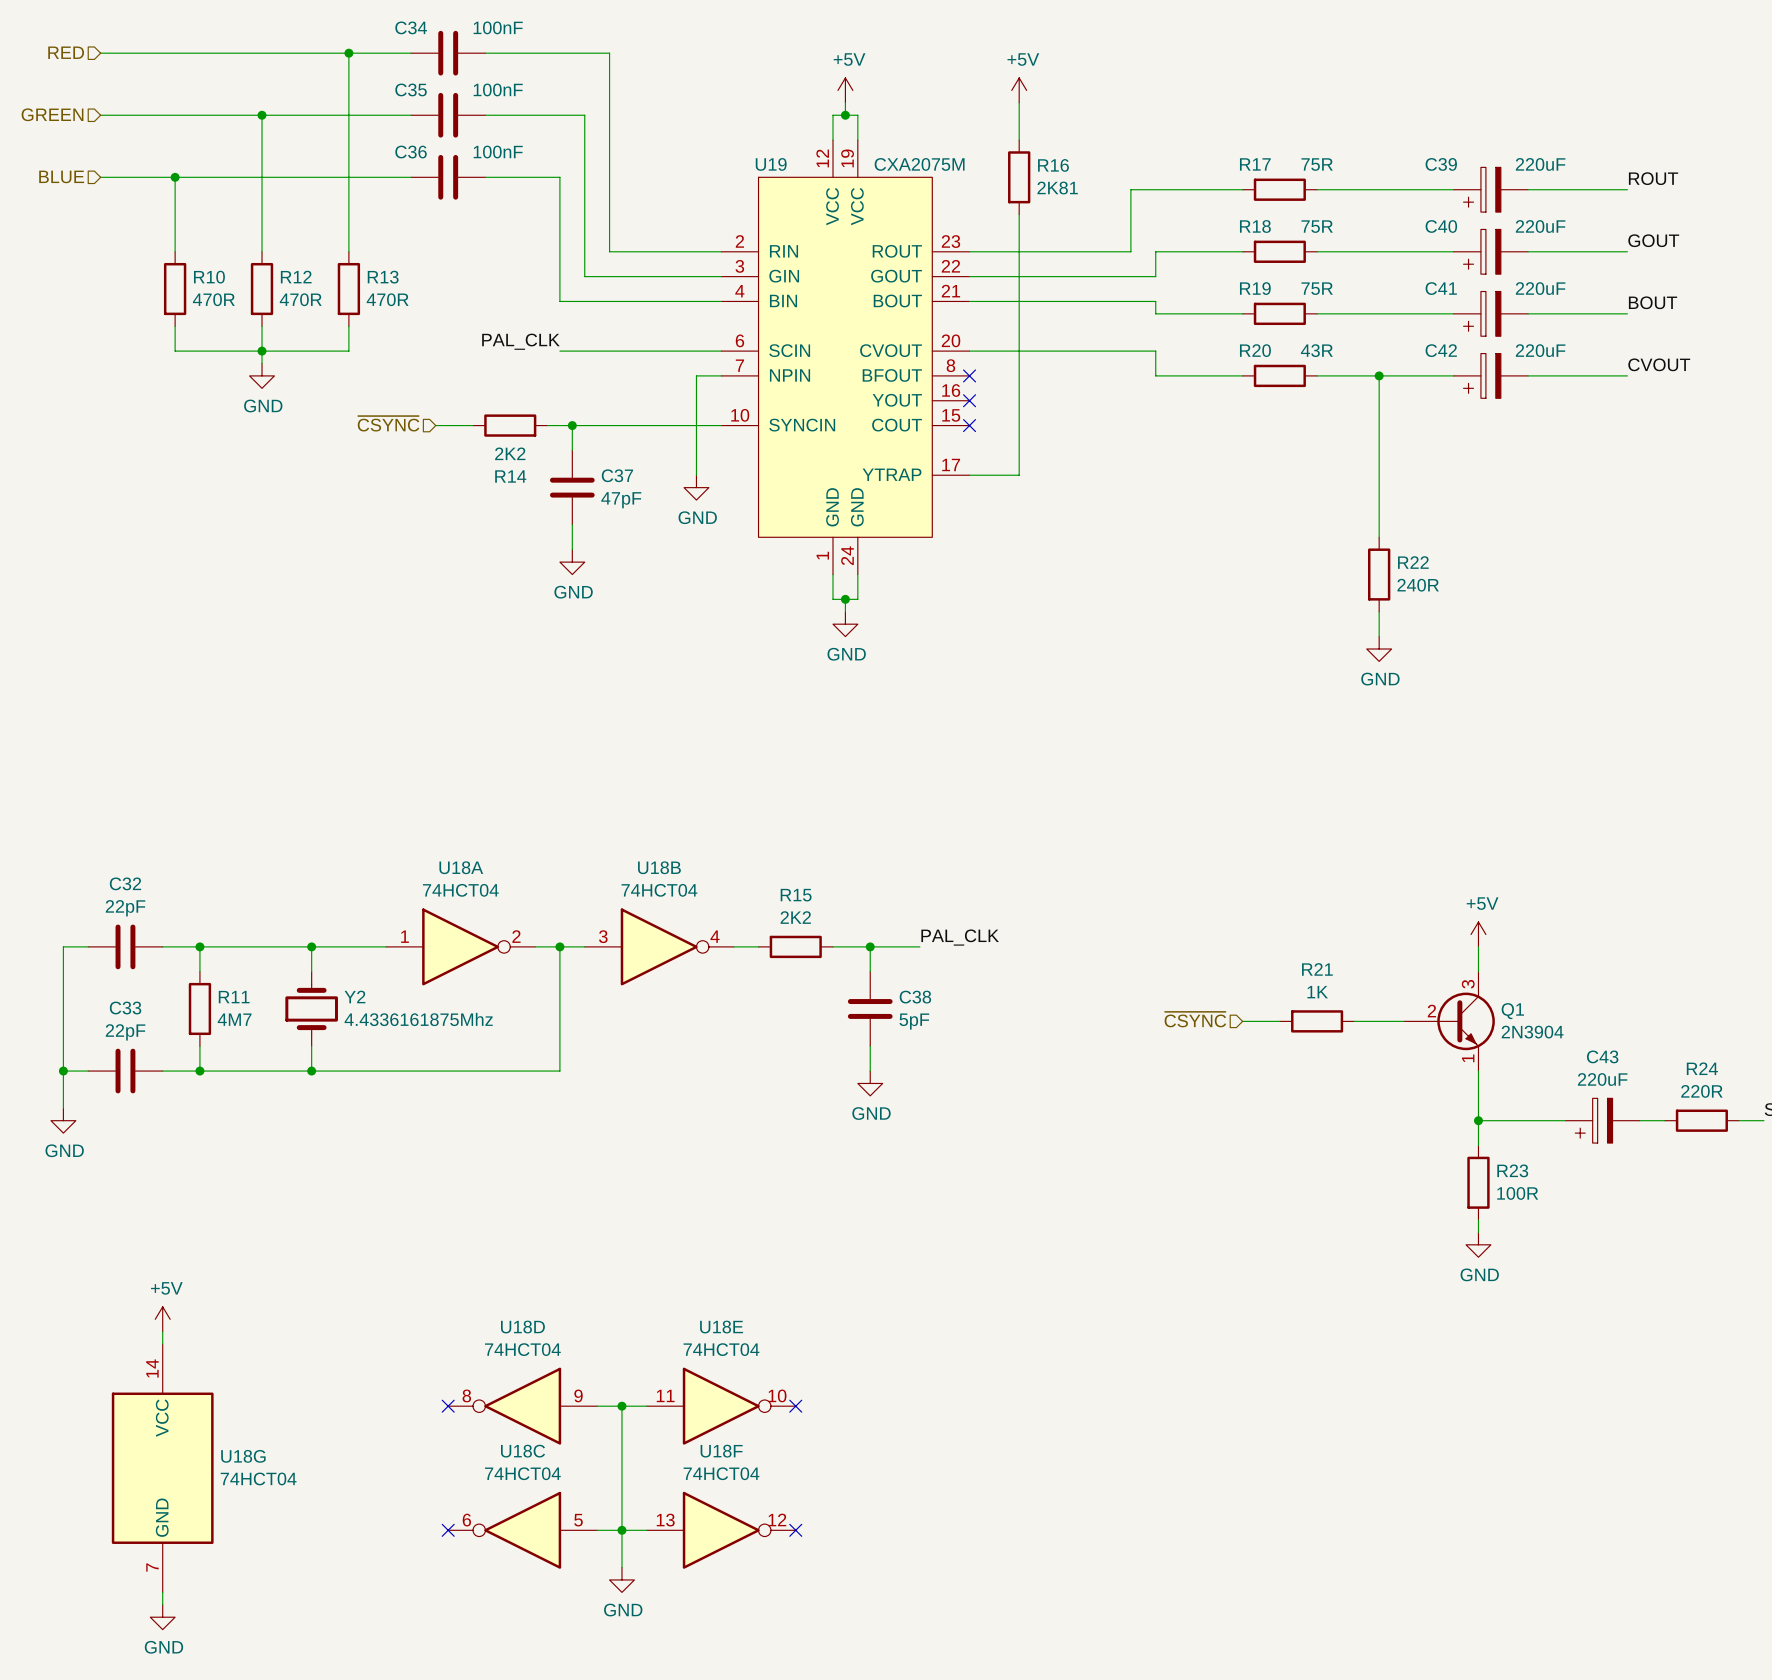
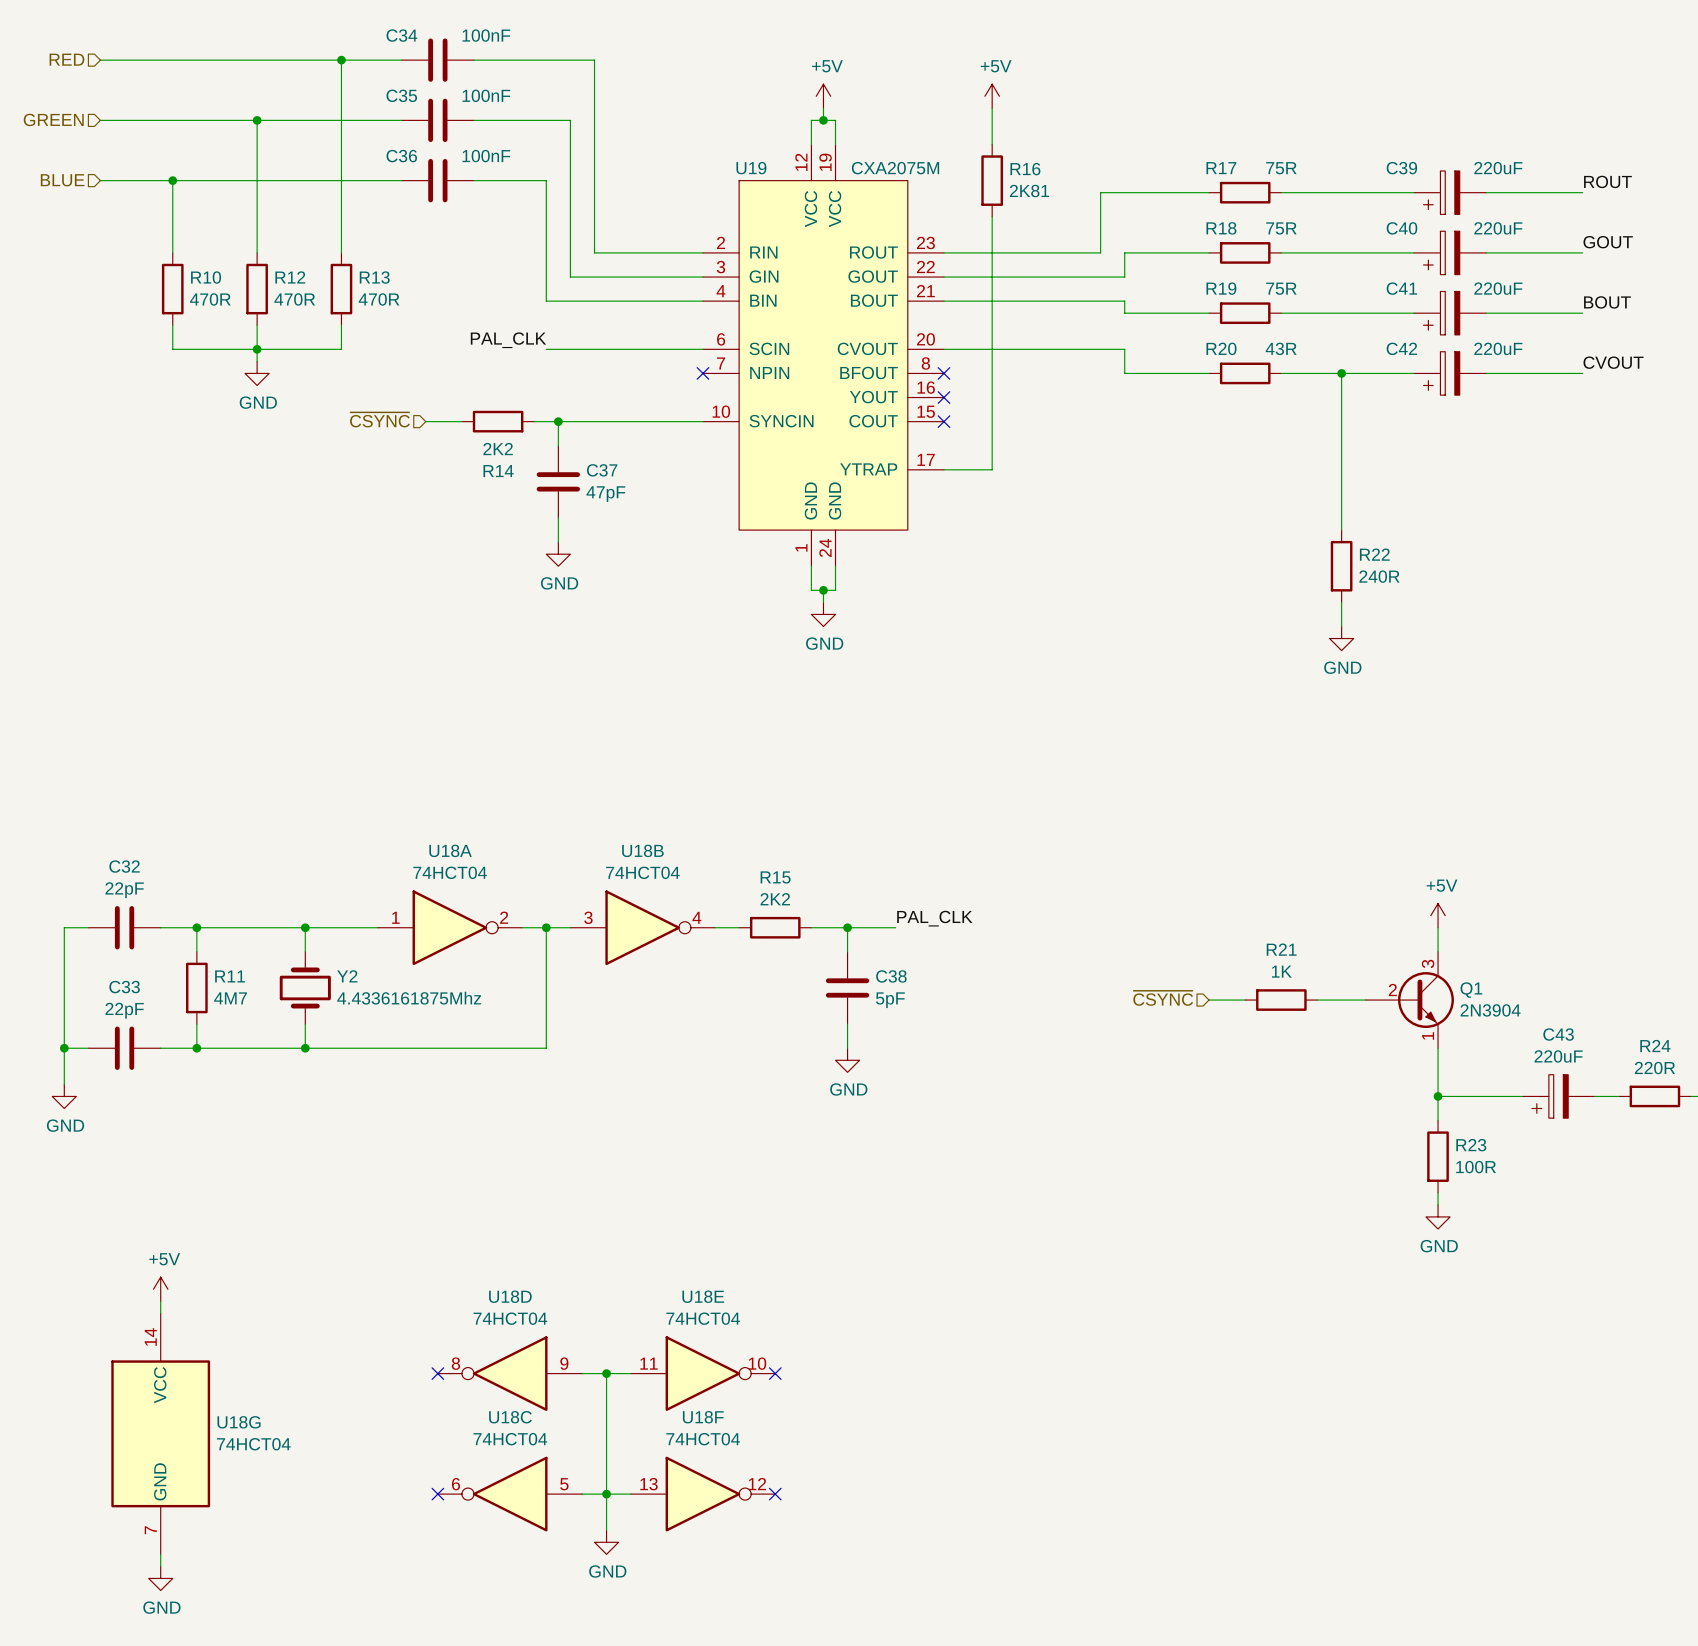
wire: (721, 375) (696, 375) (696, 475) -> none
no-connect mark: none -> (702, 373)
power symbol: GND (696, 487) -> none

